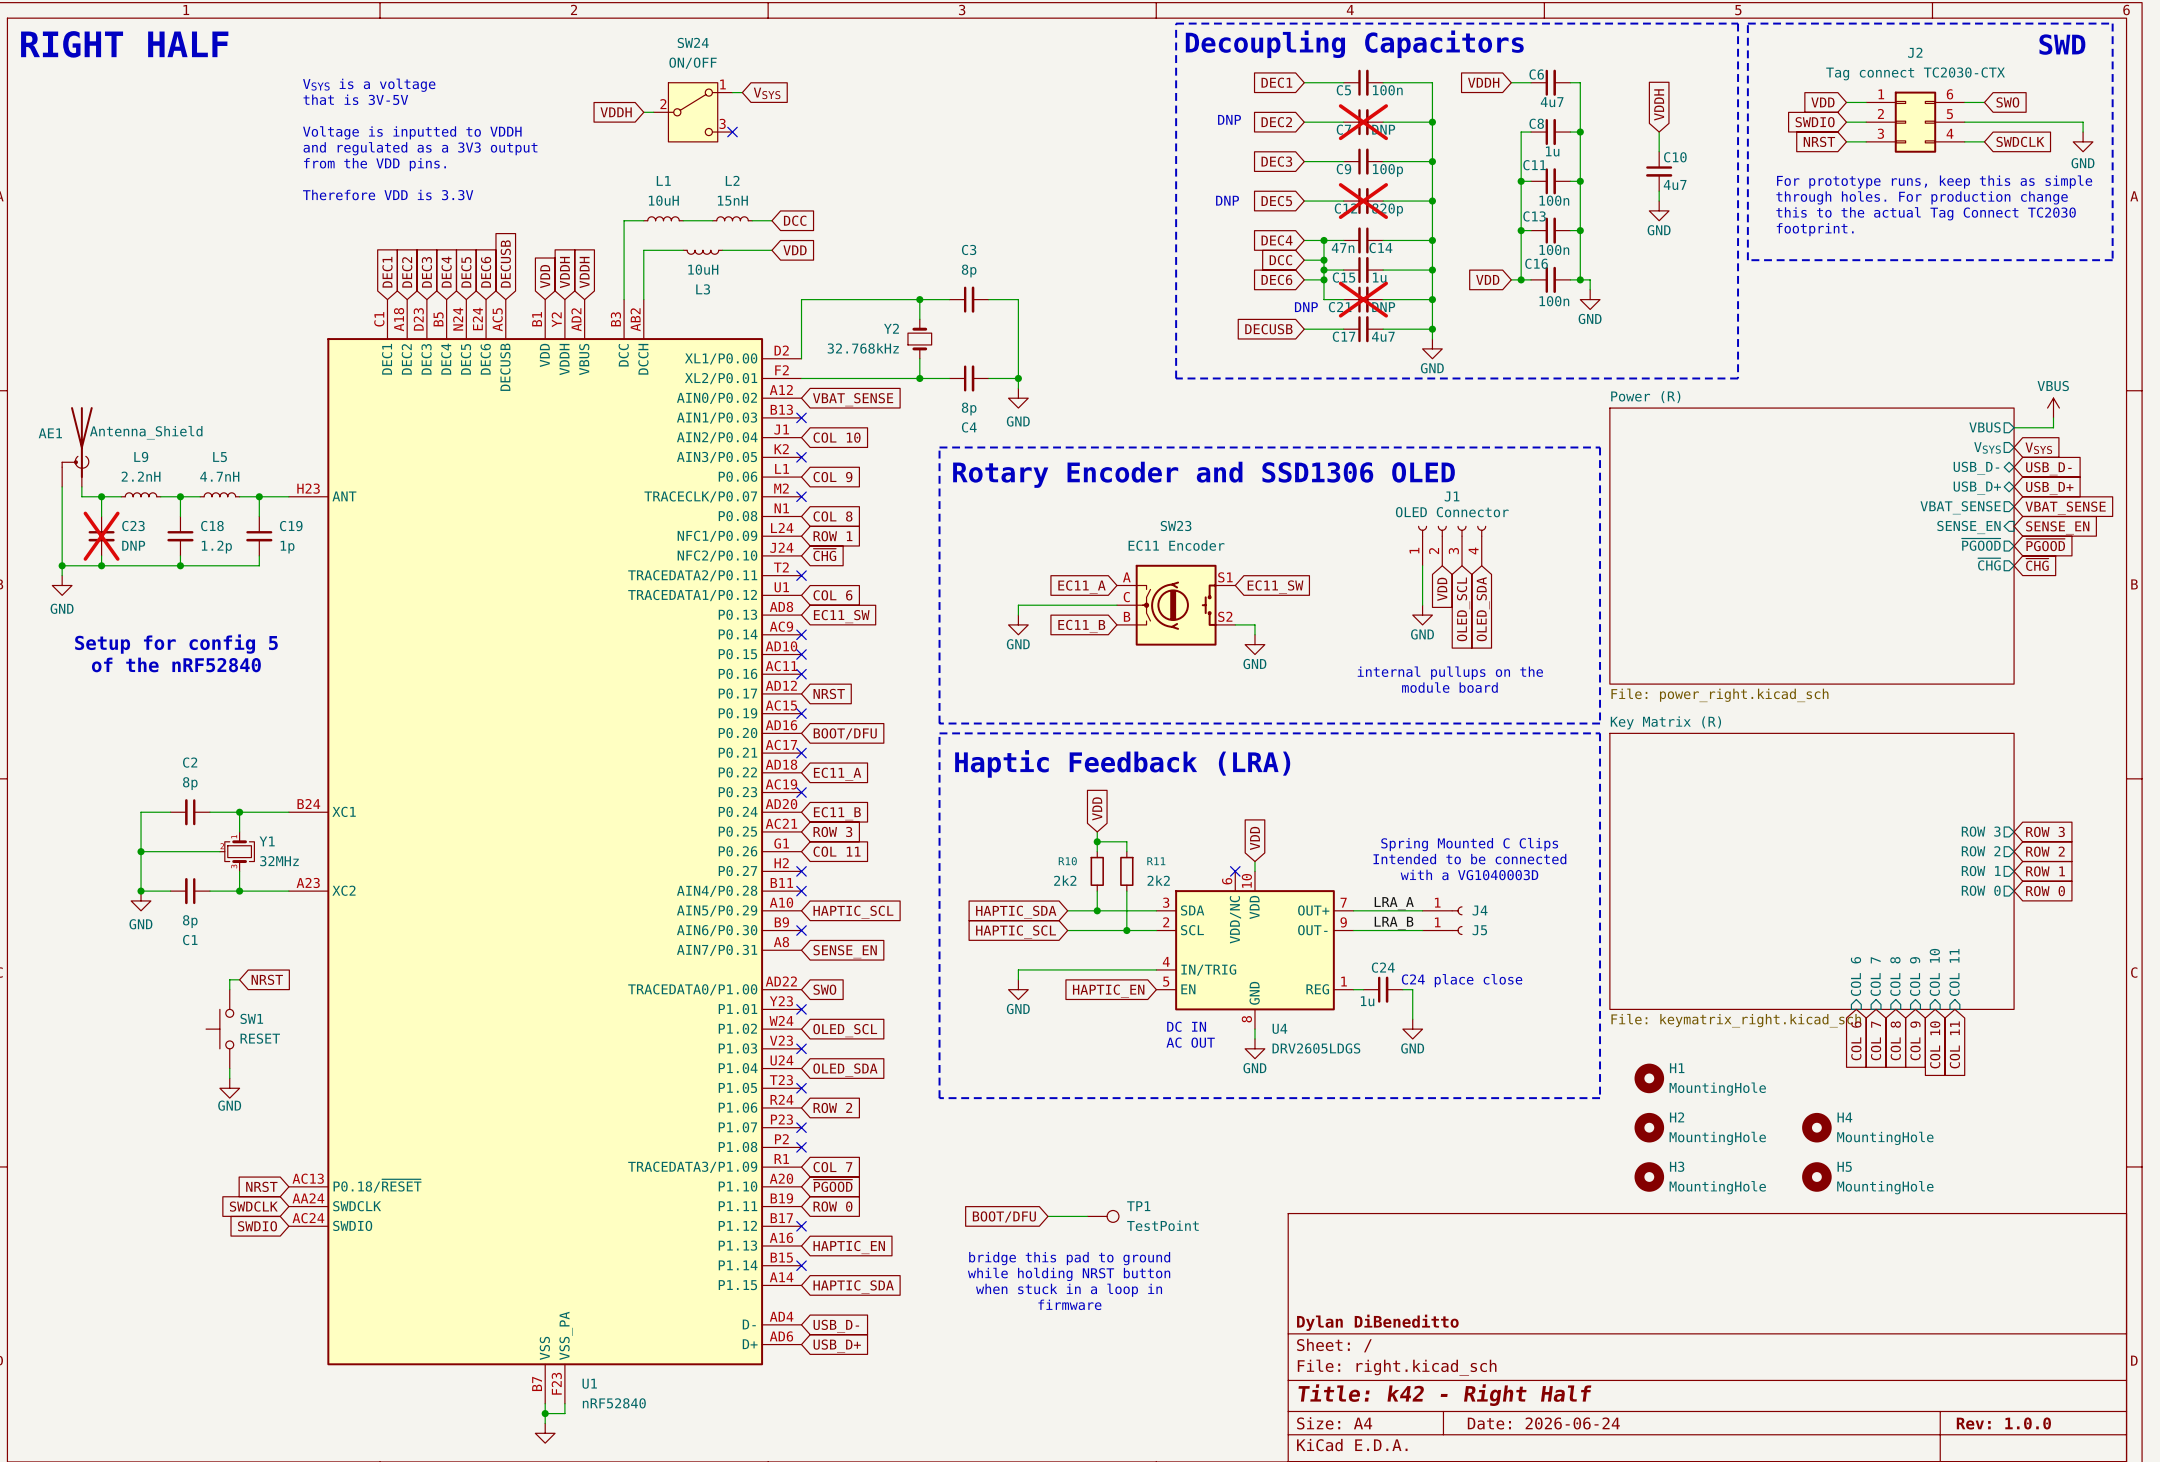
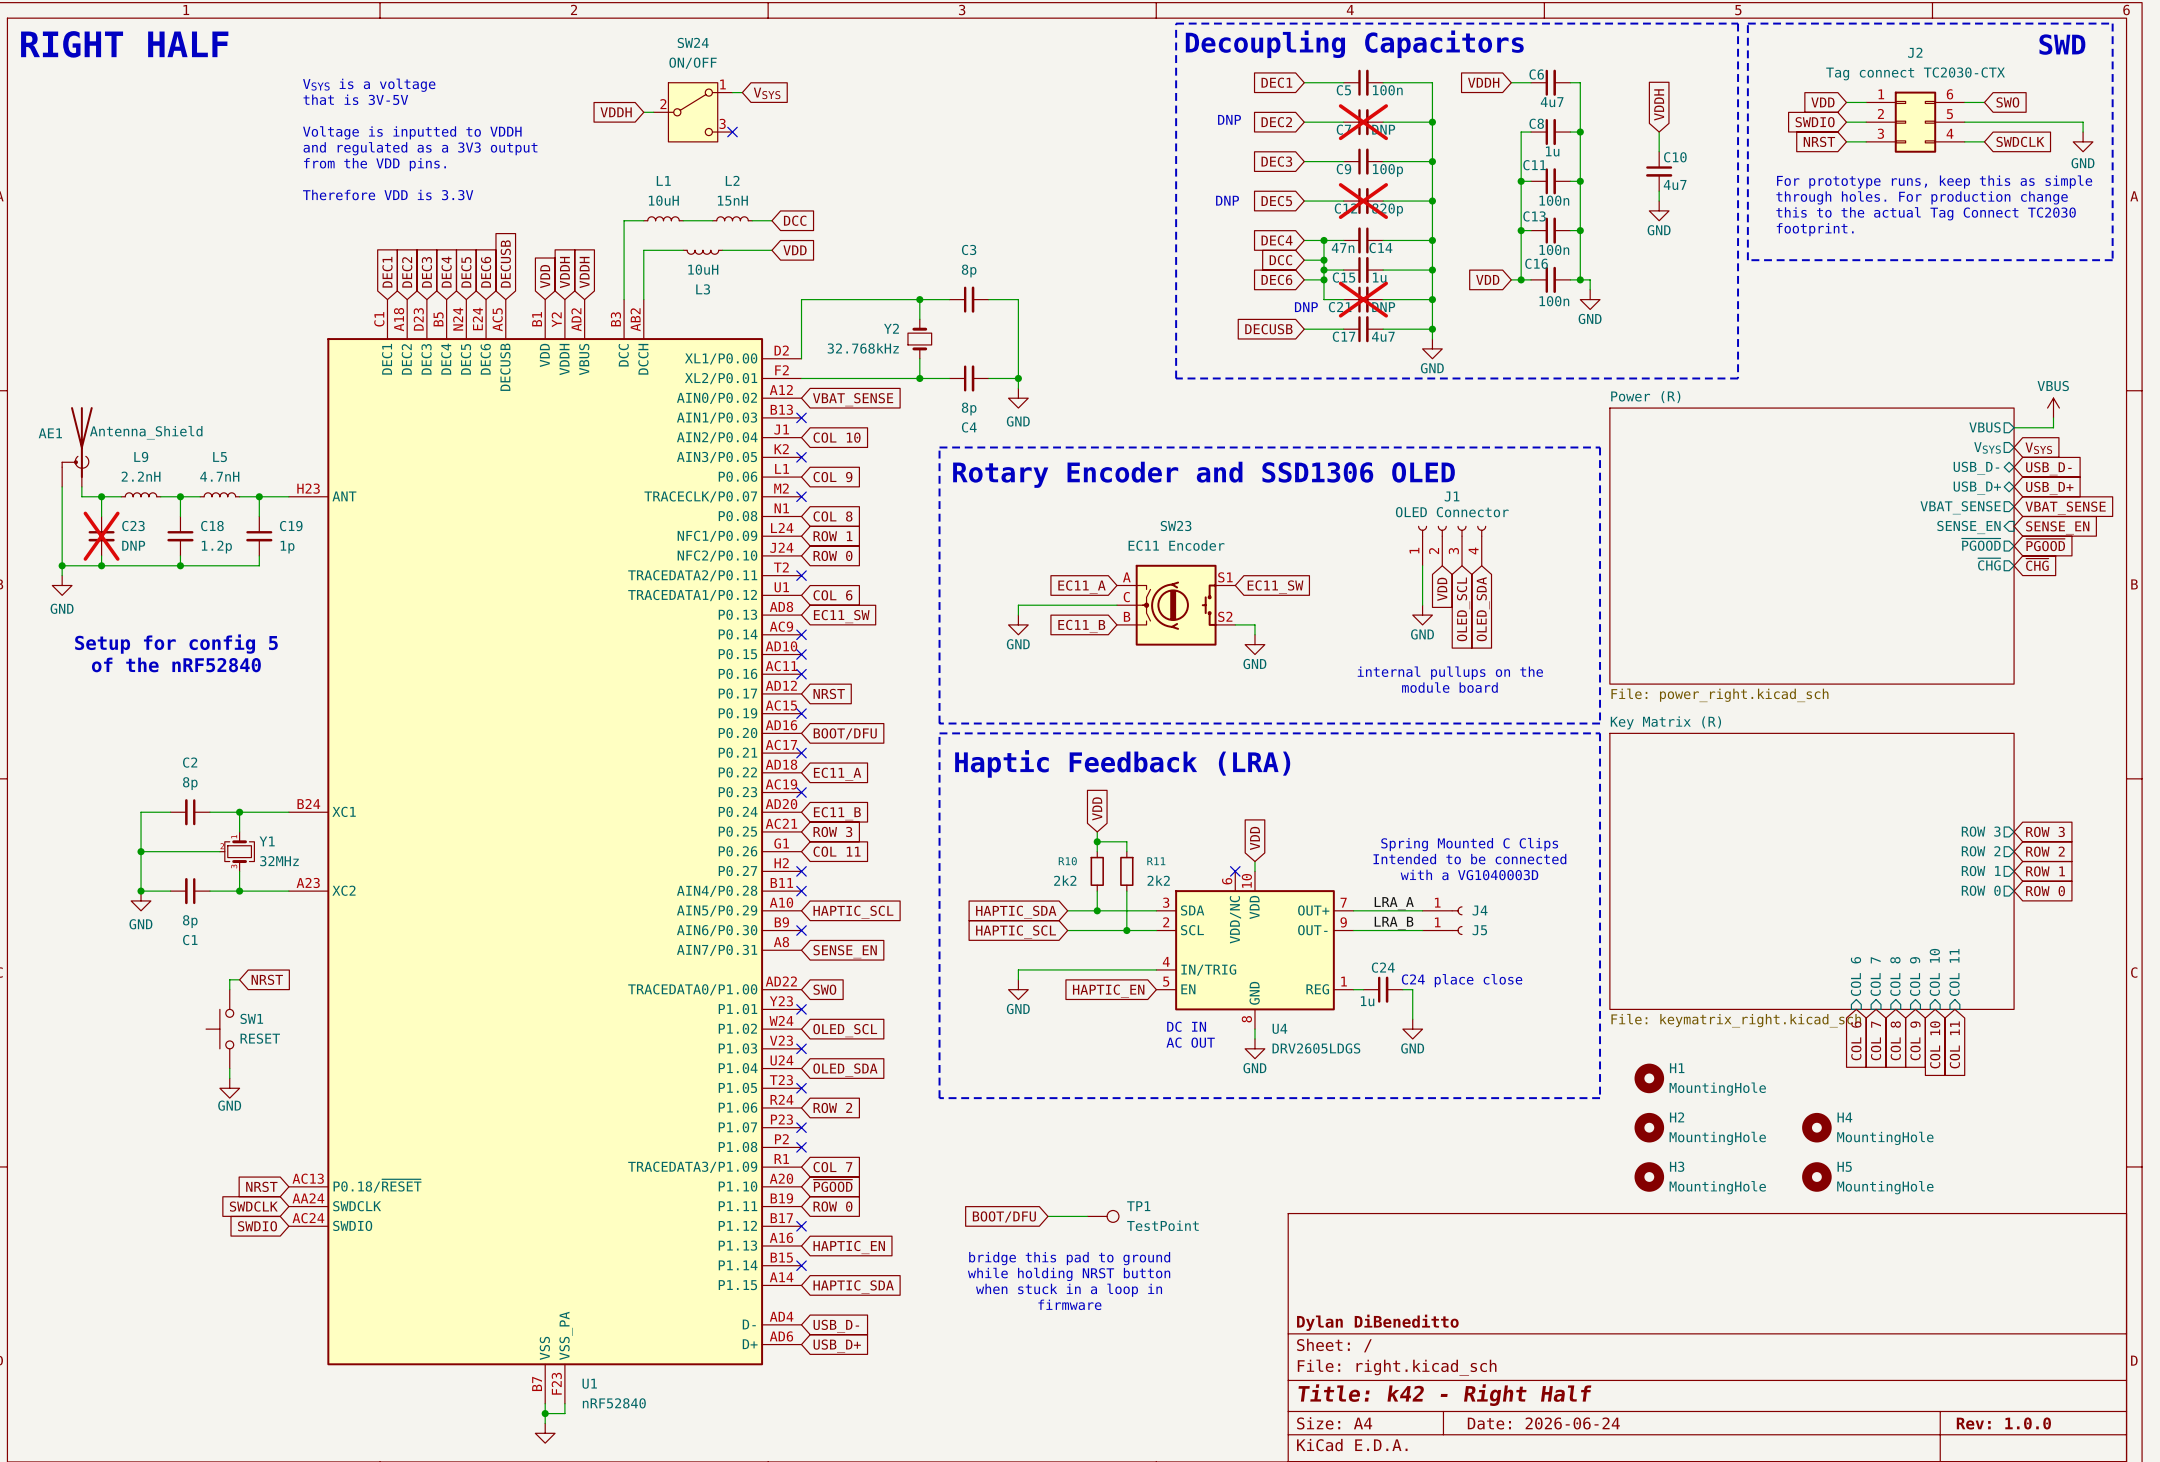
global label: ~{CHG} (824, 554) -> ROW 0 (832, 555)

